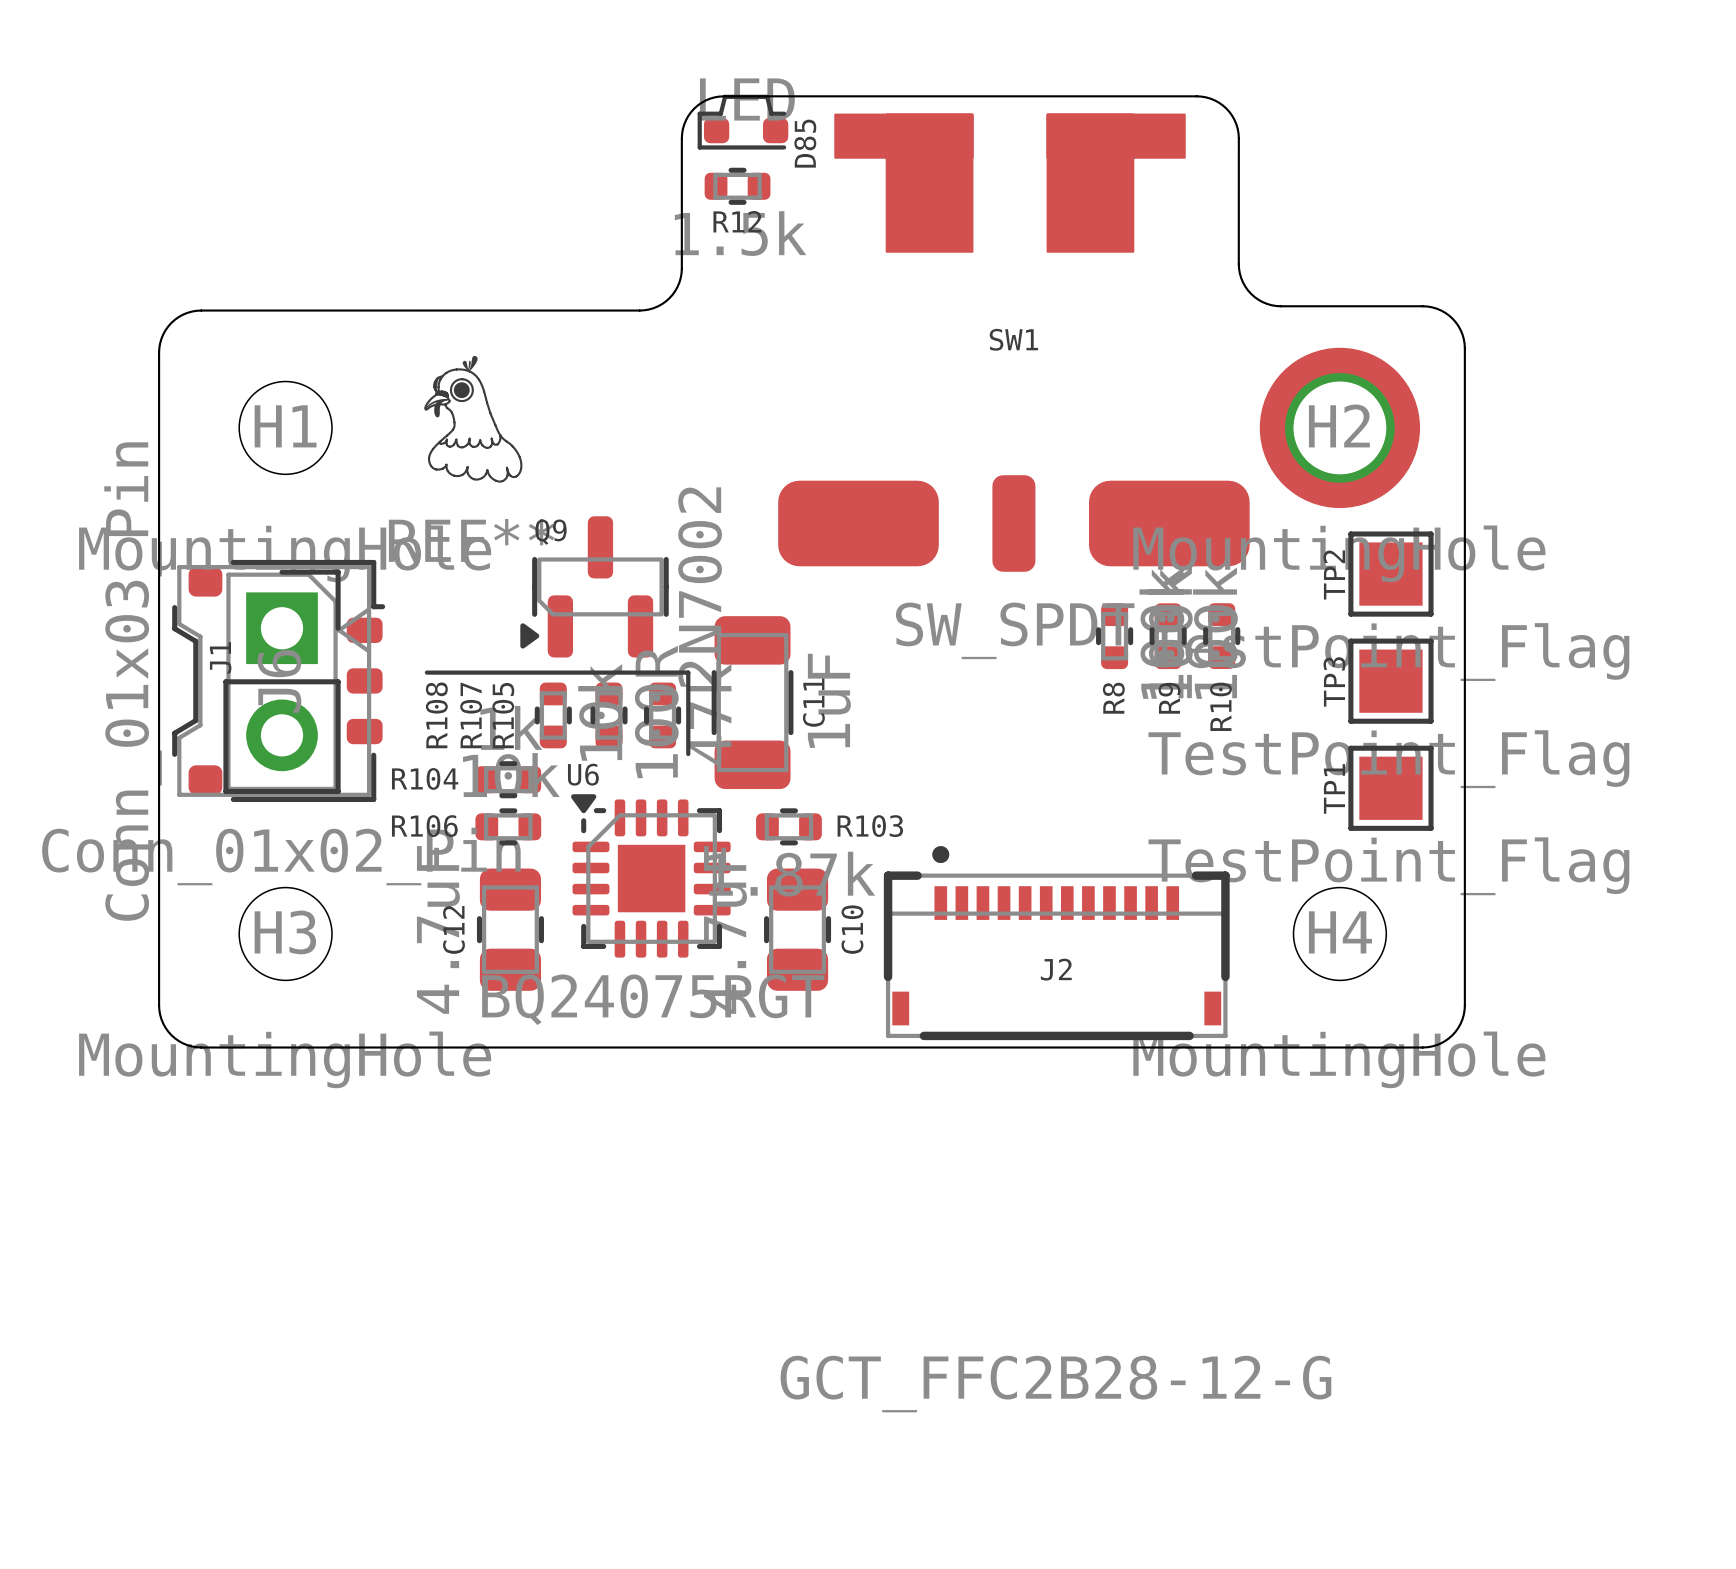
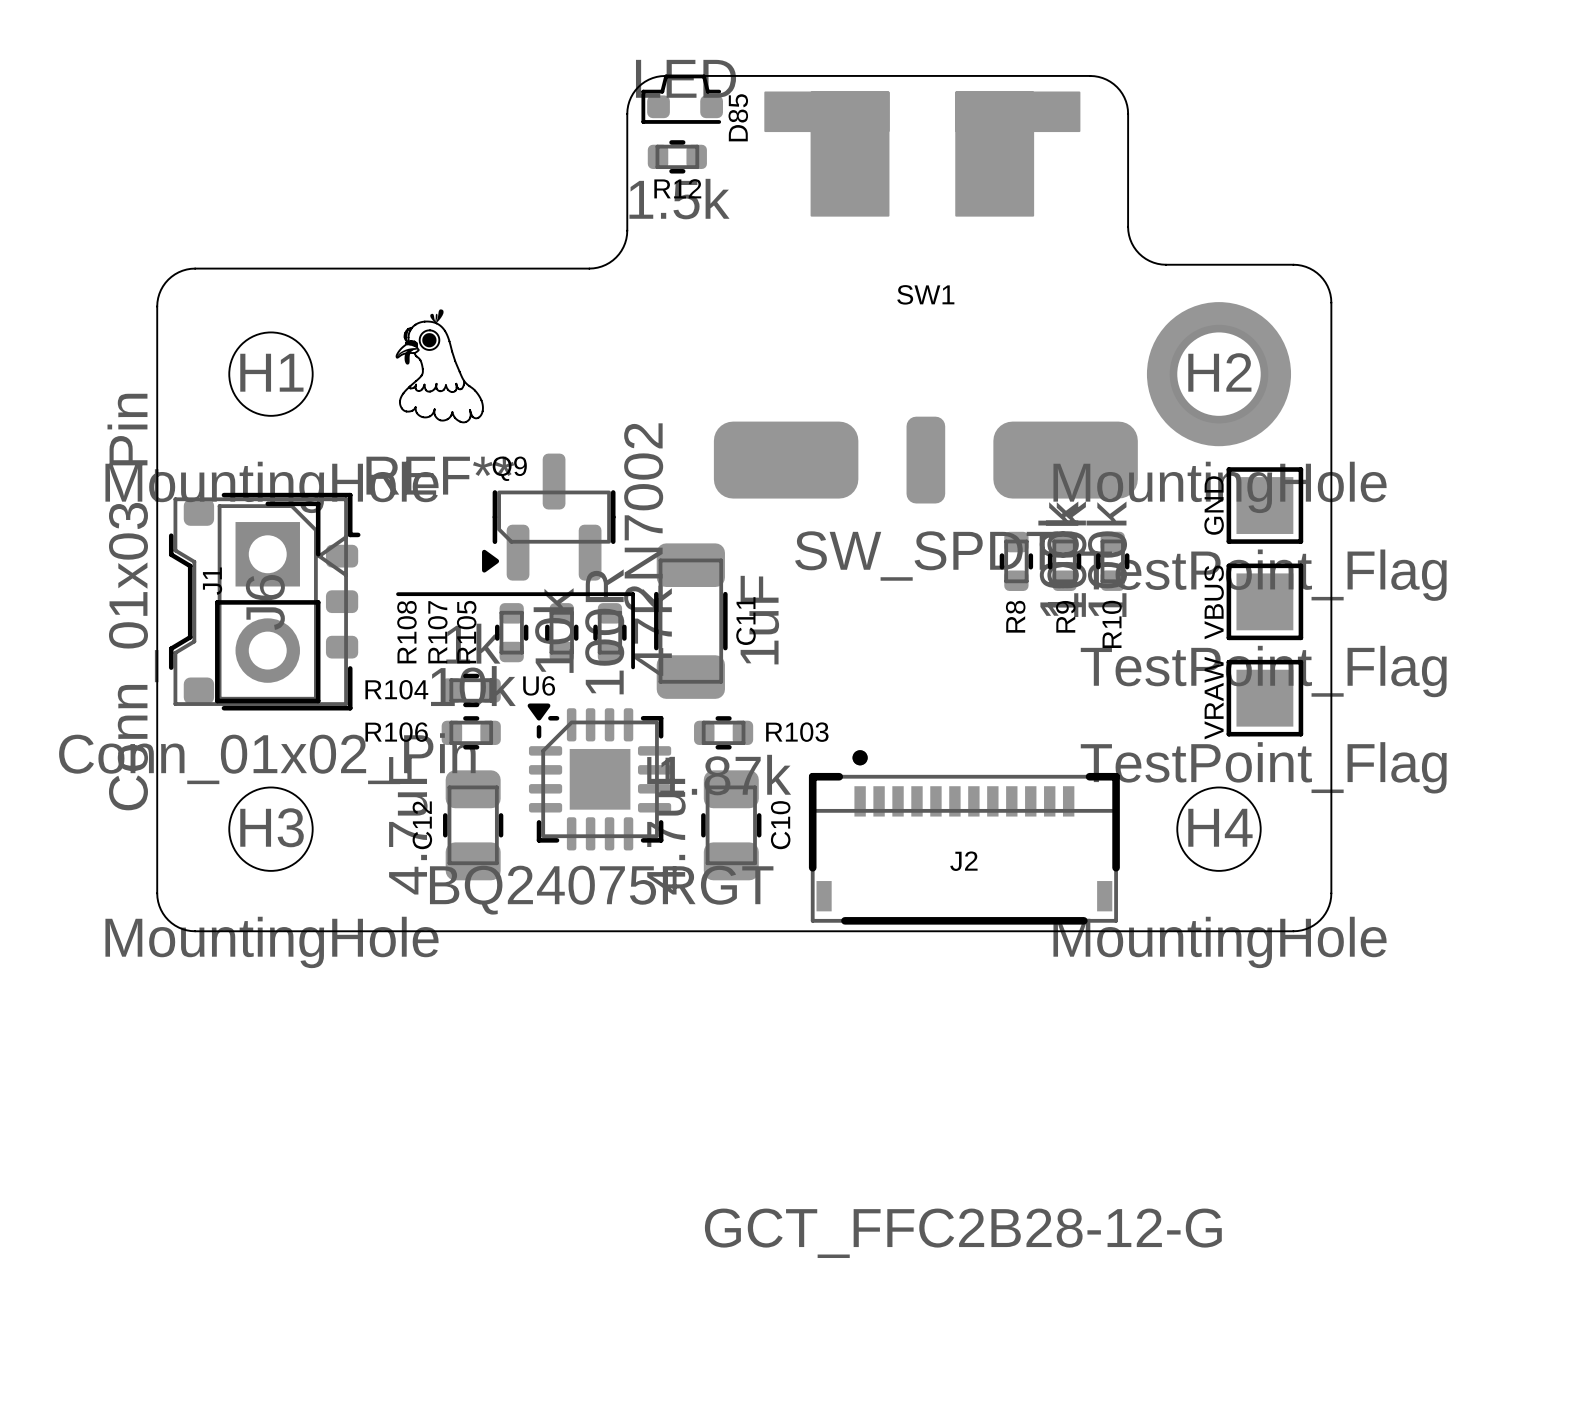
TP2 name: TP2 (1334, 574) -> GND (1214, 505)
TP3 name: TP3 (1334, 681) -> VBUS (1214, 602)
TP1 name: TP1 (1334, 788) -> VRAW (1214, 698)

